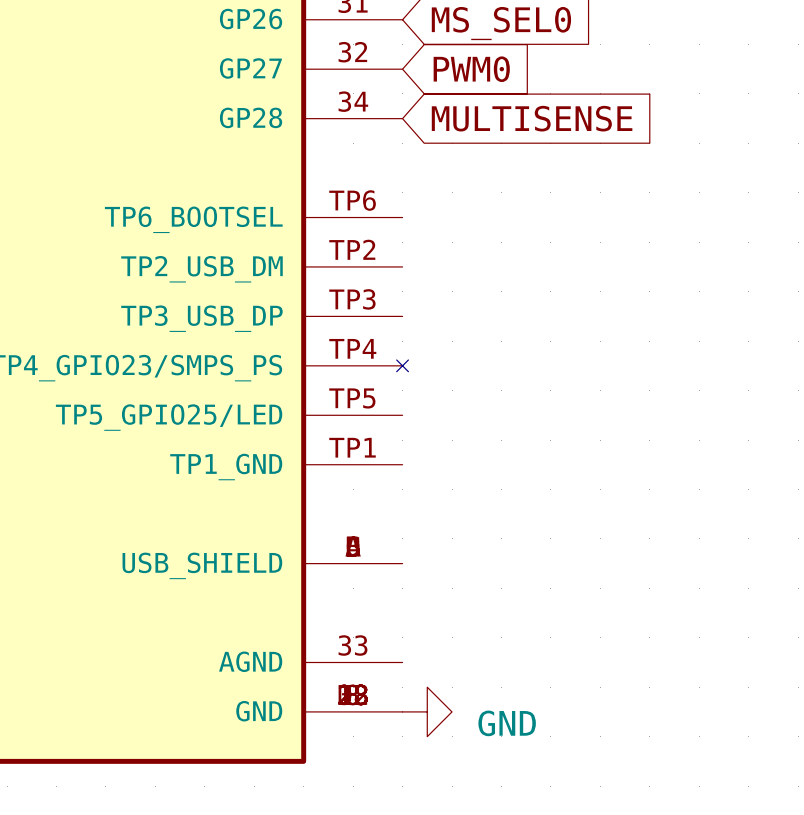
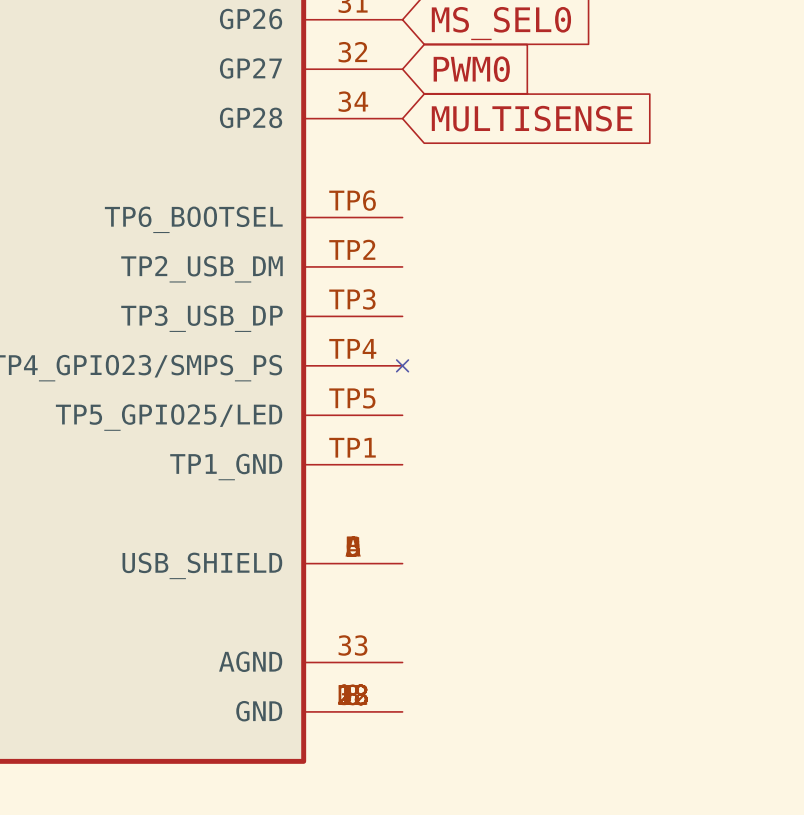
power symbol: GND (427, 711) -> none

